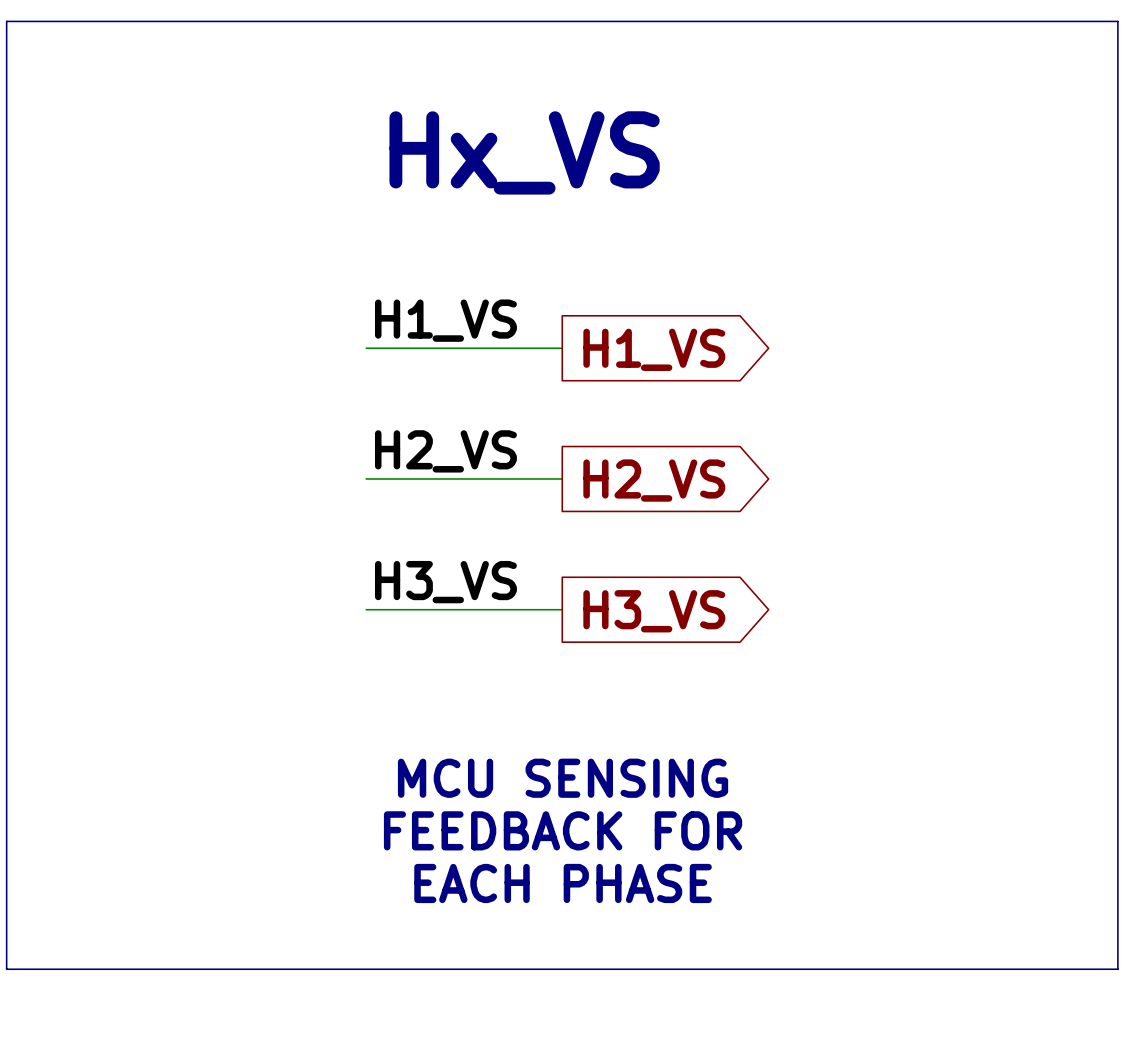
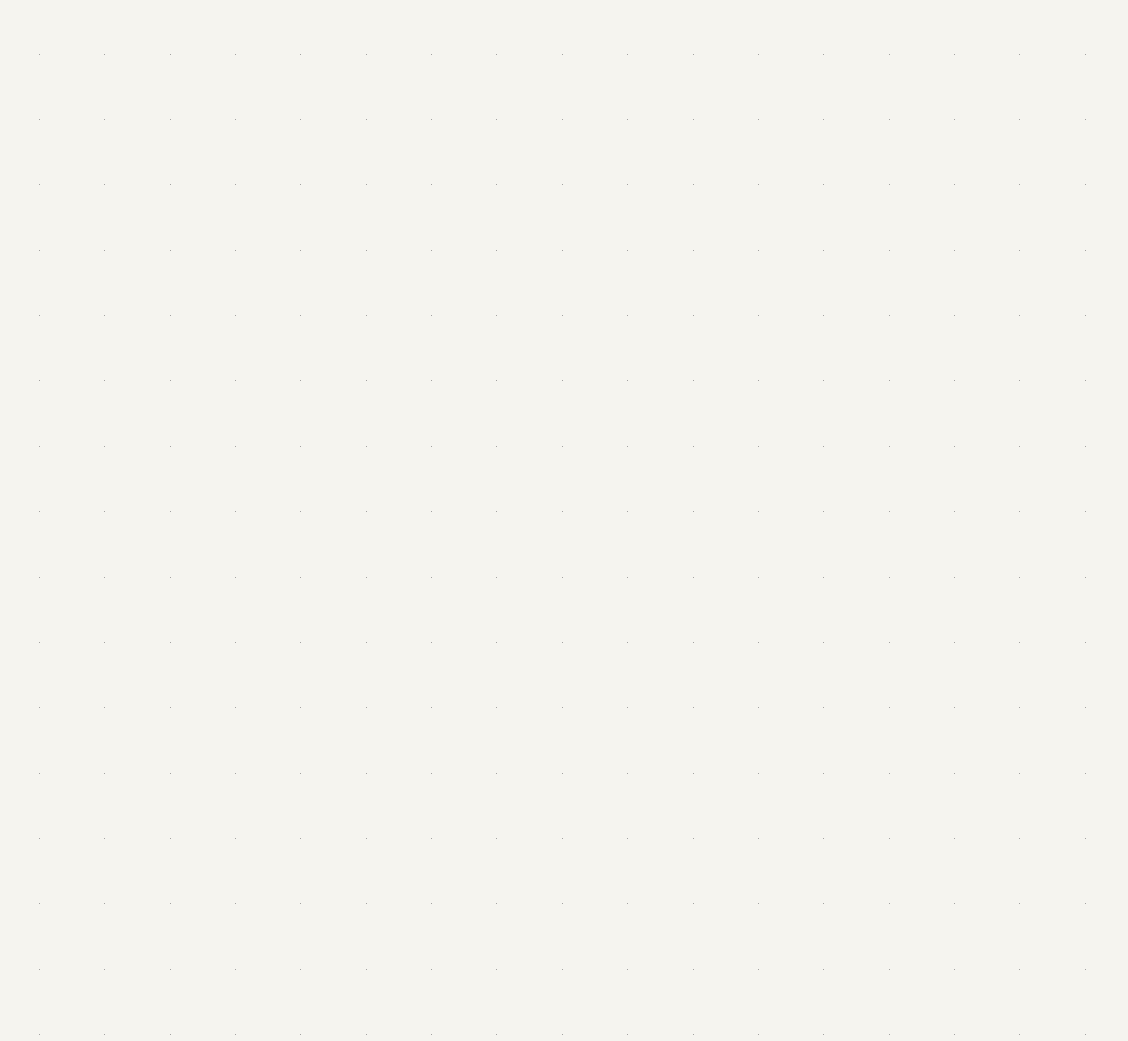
line: (6, 21) (1117, 21) (1117, 969) (6, 969) (6, 21) -> none
text: Hx_VS (524, 152) -> none
label: H1_VS (445, 320) -> none
wire: (366, 348) (562, 348) -> none
global label: H1_VS (654, 349) -> none
label: H2_VS (445, 451) -> none
wire: (366, 478) (562, 478) -> none
global label: H2_VS (654, 480) -> none
label: H3_VS (445, 582) -> none
wire: (366, 609) (562, 609) -> none
global label: H3_VS (654, 611) -> none
text: MCU SENSING (563, 778) -> none
text: FEEDBACK FOR (563, 830) -> none
text: EACH PHASE (563, 883) -> none

